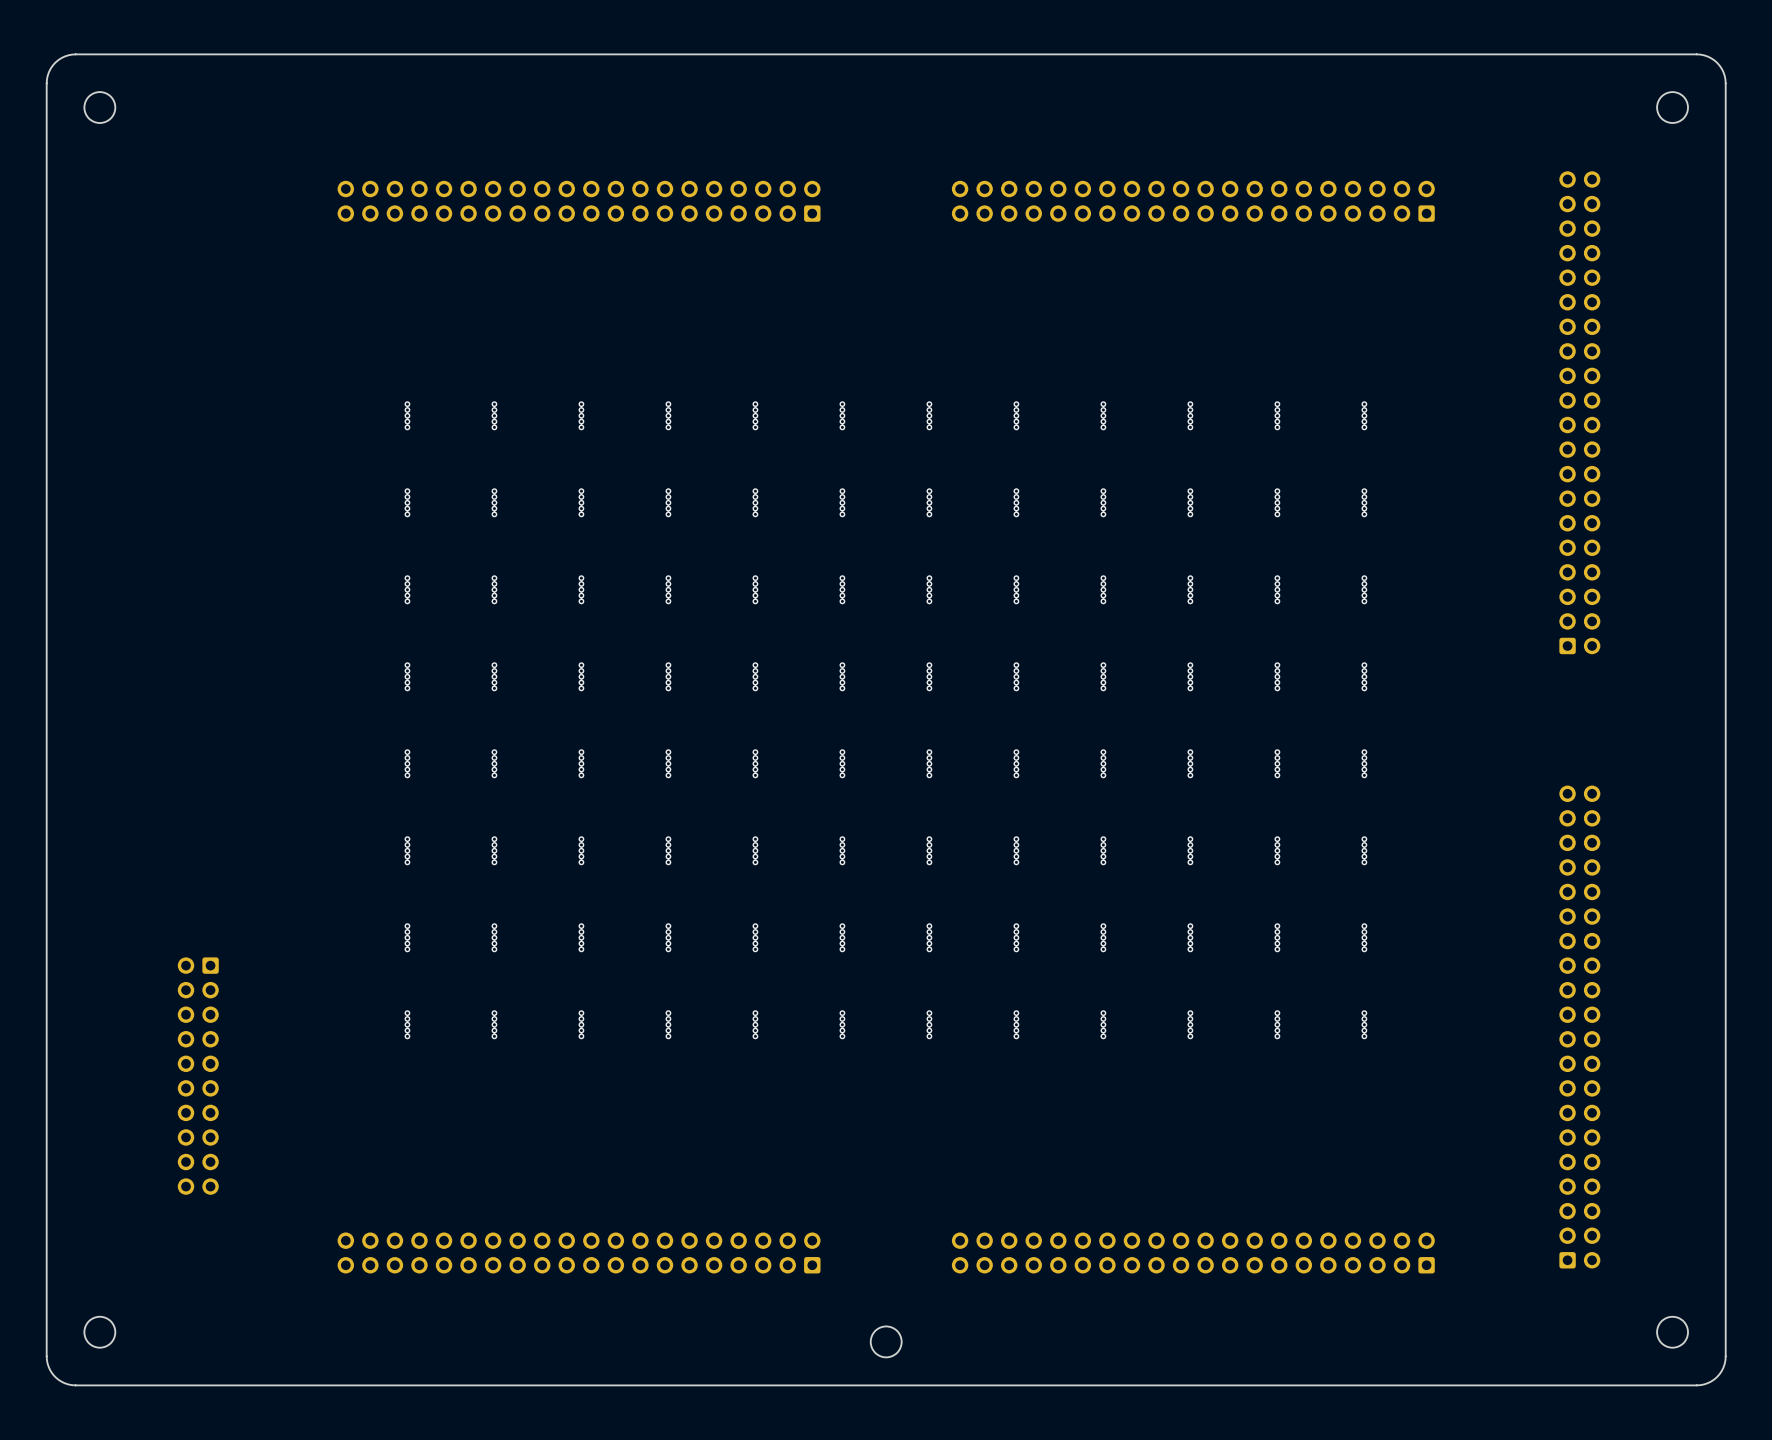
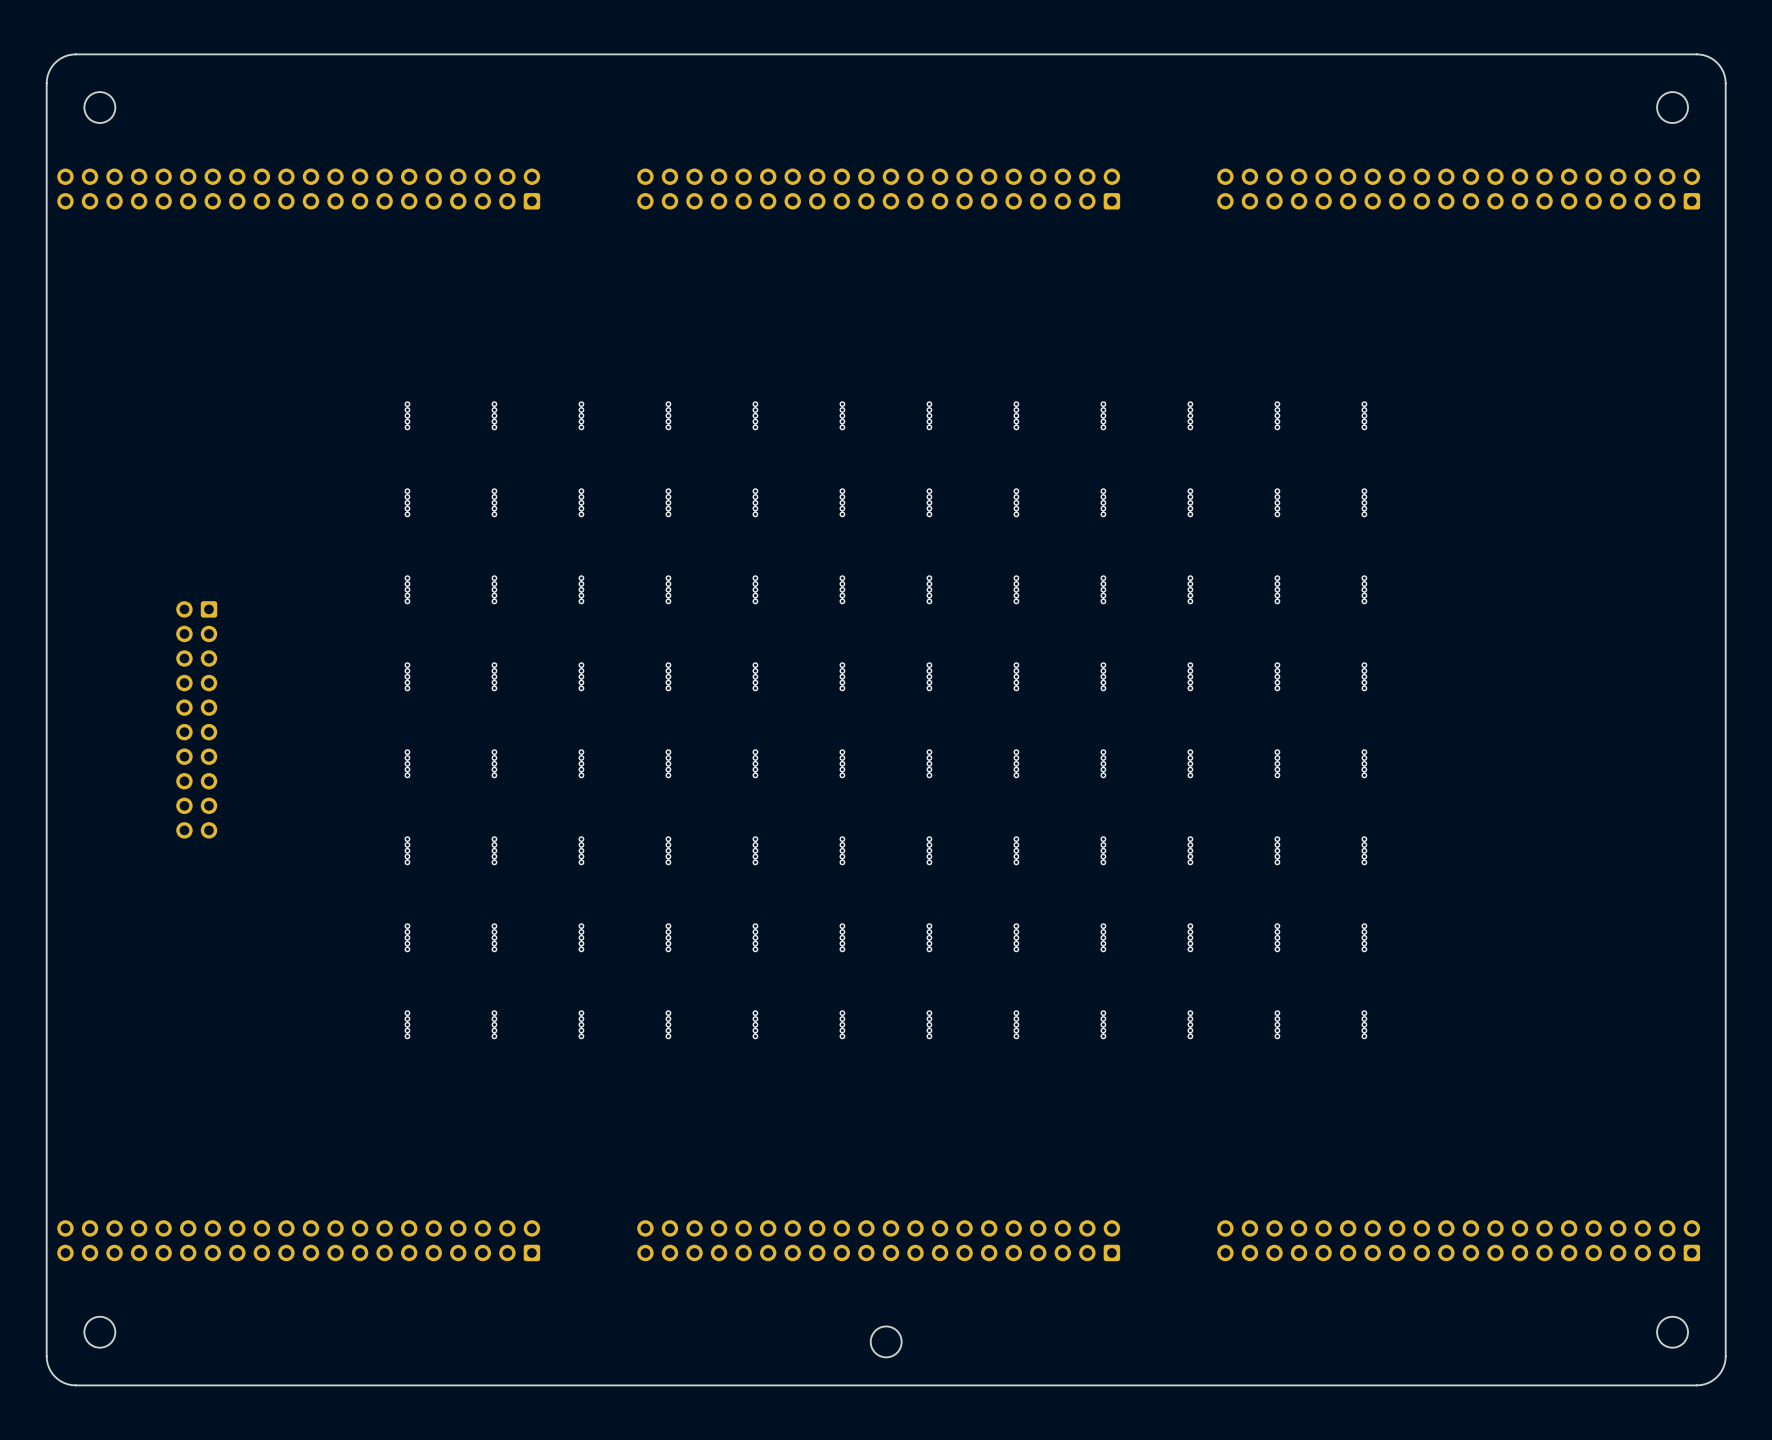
part: none -> (298, 189)
part: none -> (878, 189)
part: none -> (1458, 189)
part: (579, 201) -> none
part: (1193, 201) -> none
part: (1579, 412) -> none
part: none -> (196, 719)
part: (1579, 1027) -> none
part: (198, 1076) -> none
part: none -> (298, 1240)
part: none -> (878, 1240)
part: none -> (1458, 1240)
part: (579, 1252) -> none
part: (1193, 1252) -> none

